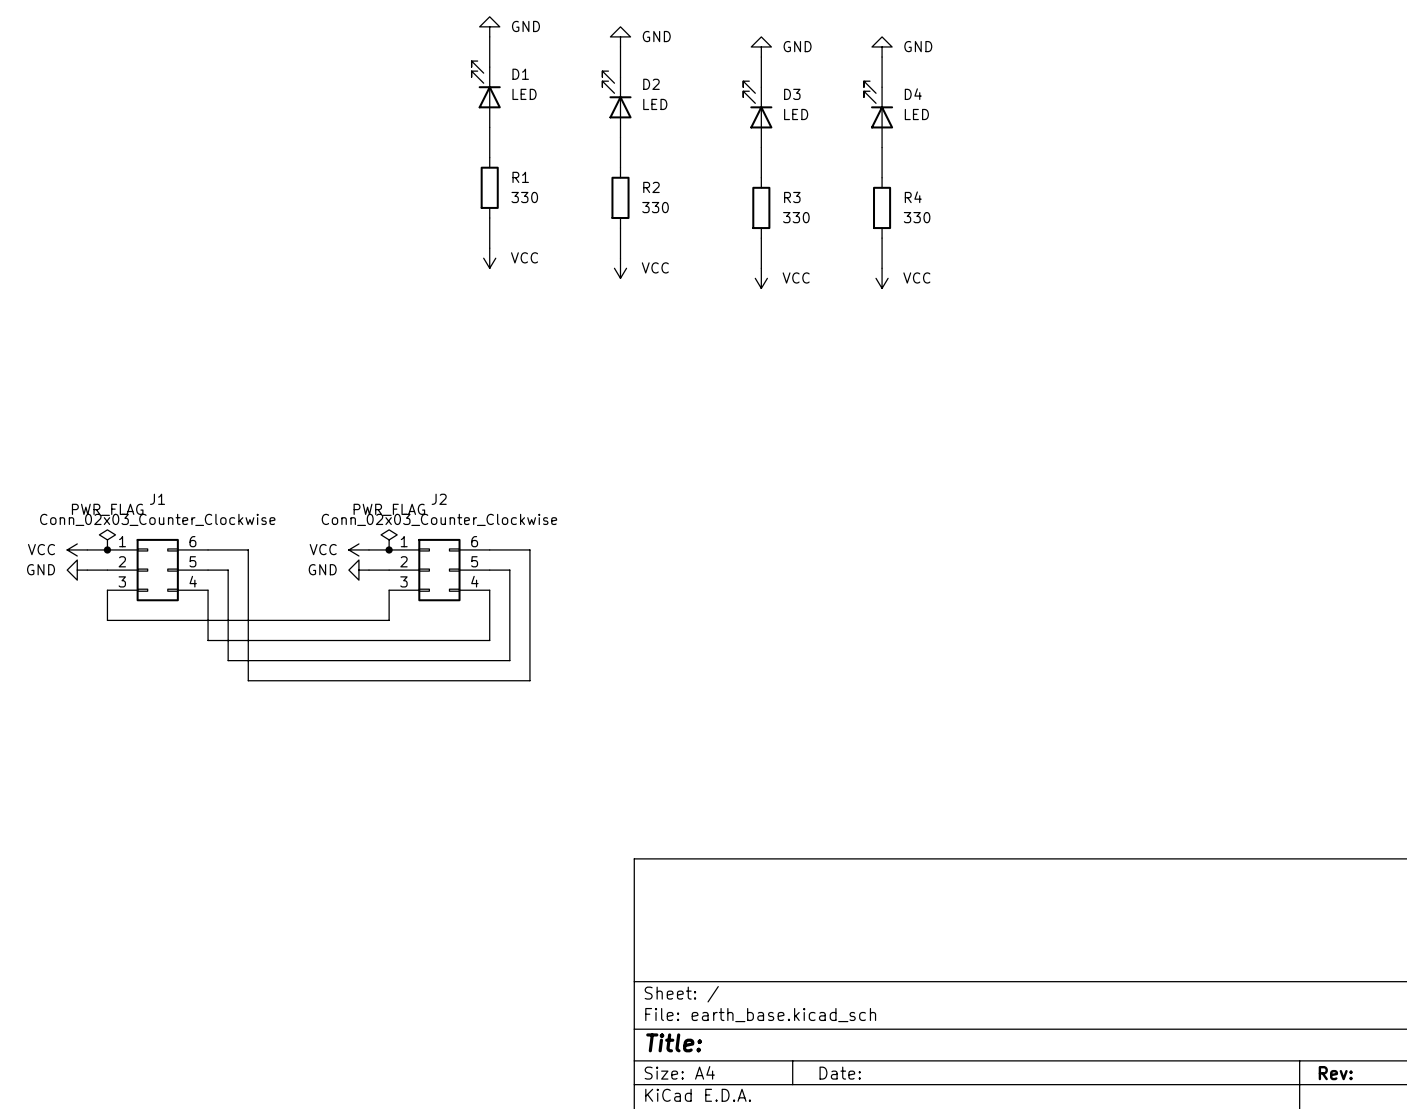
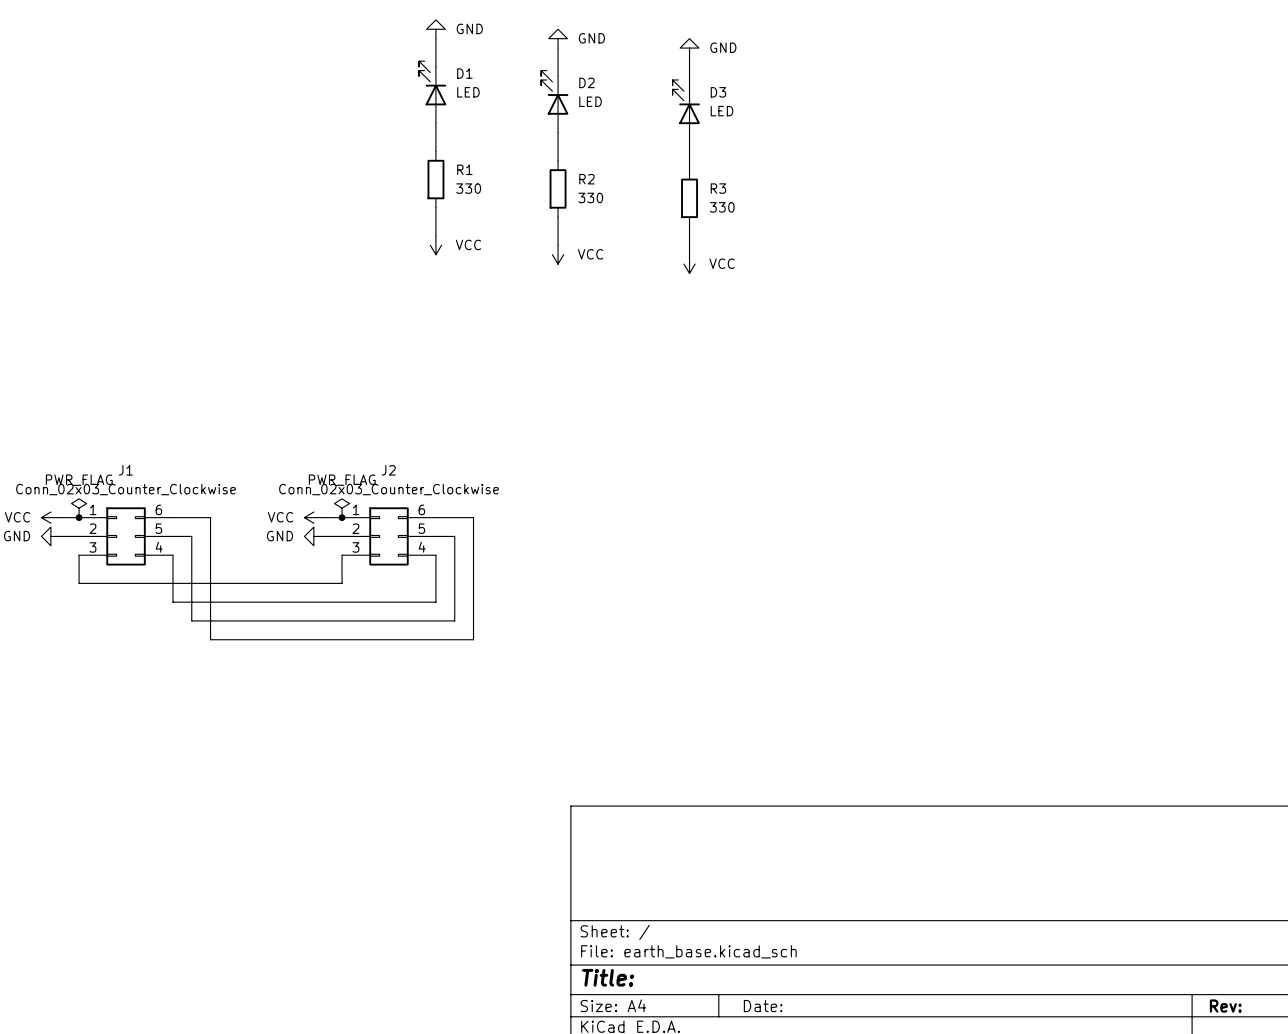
power symbol: GND (882, 46) -> none
wire: (882, 57) (882, 87) -> none
D4: LED (878, 114) -> none
wire: (882, 147) (882, 177) -> none
R4: 330 (882, 207) -> none
wire: (882, 238) (882, 268) -> none
power symbol: VCC (882, 278) -> none

